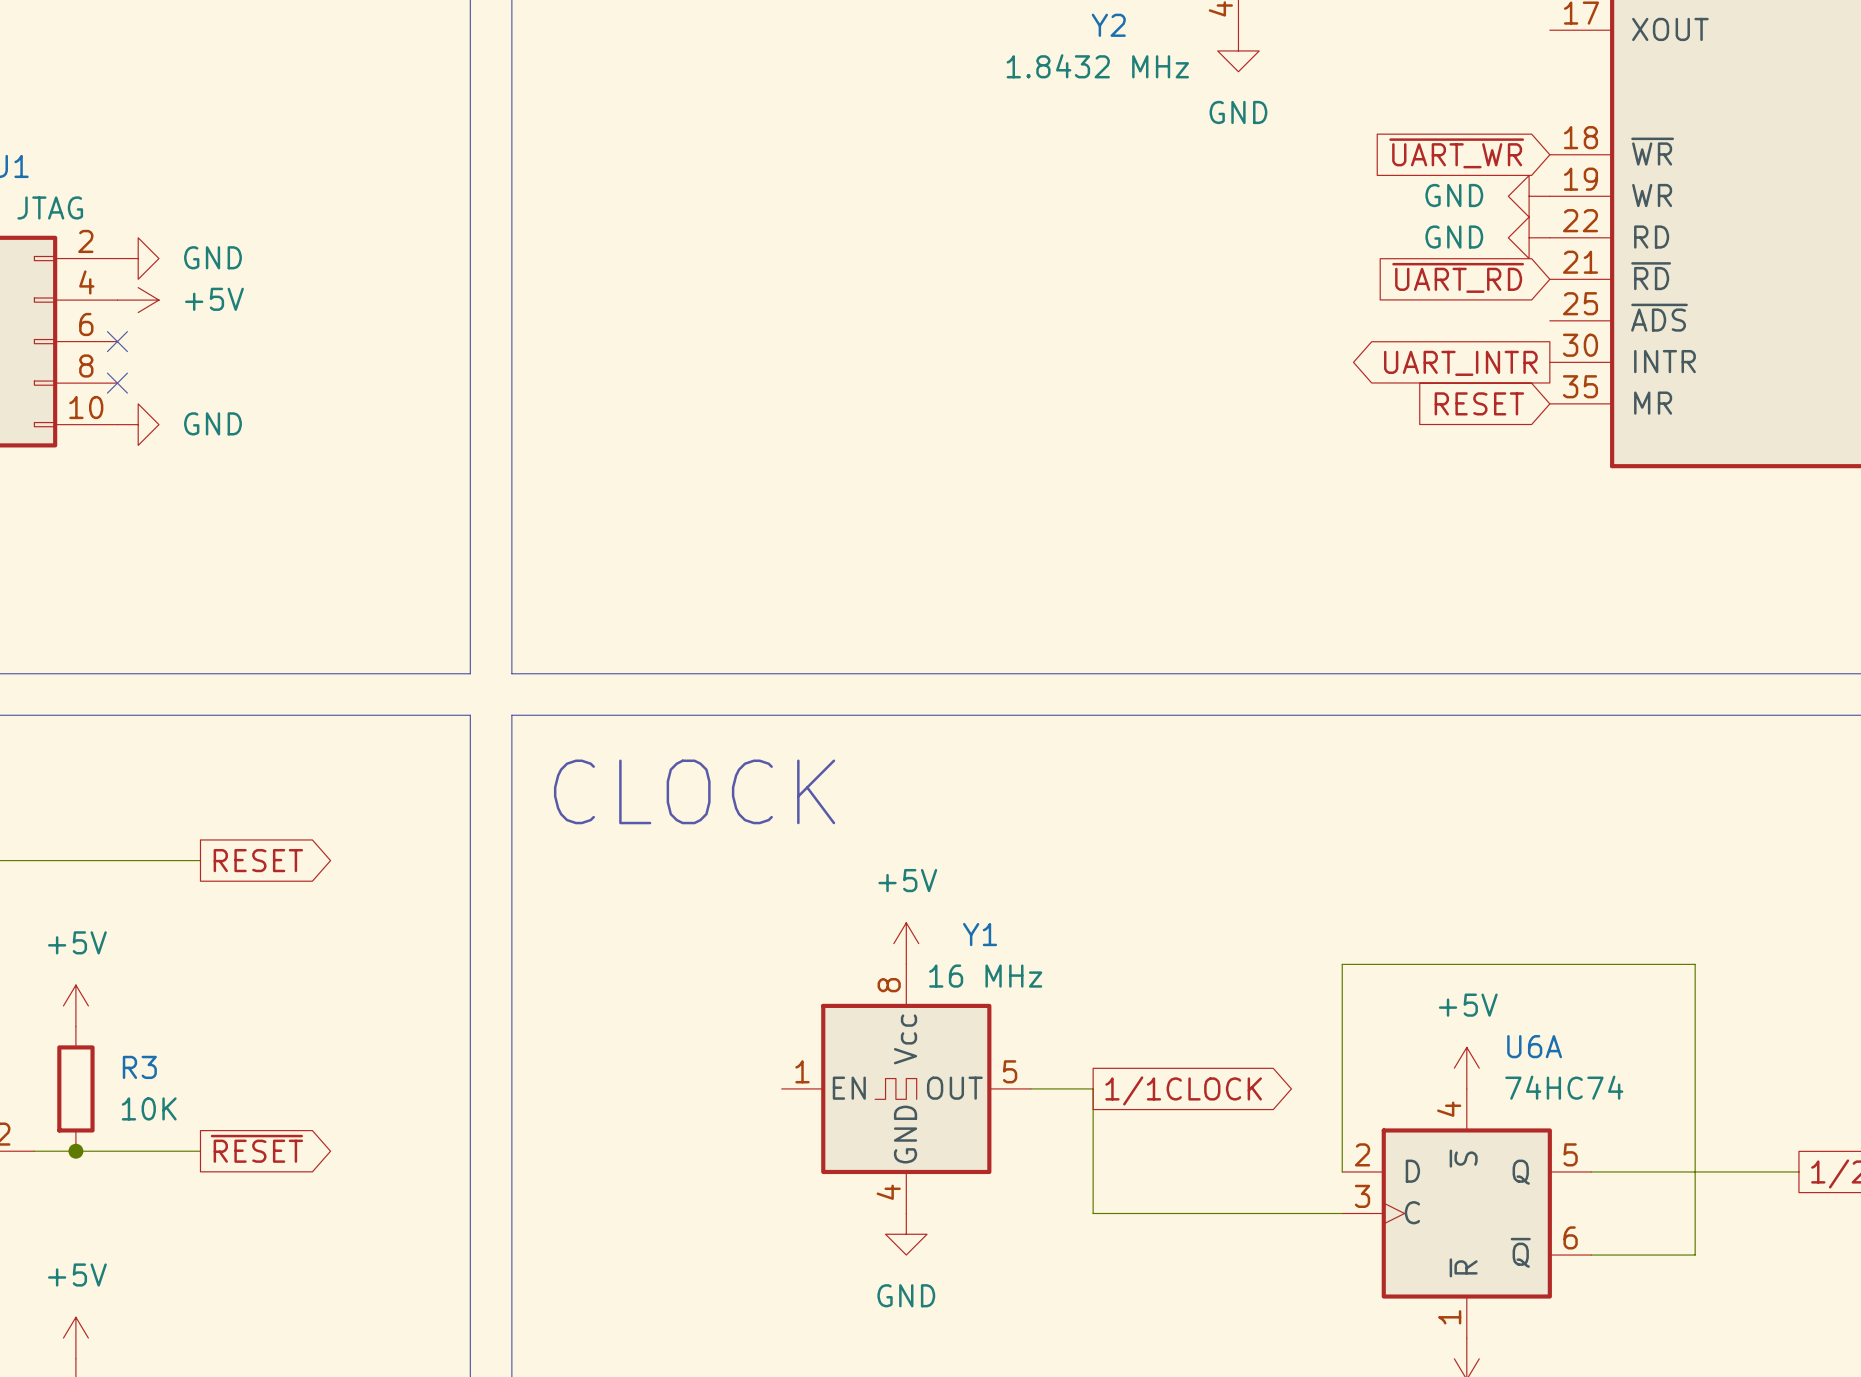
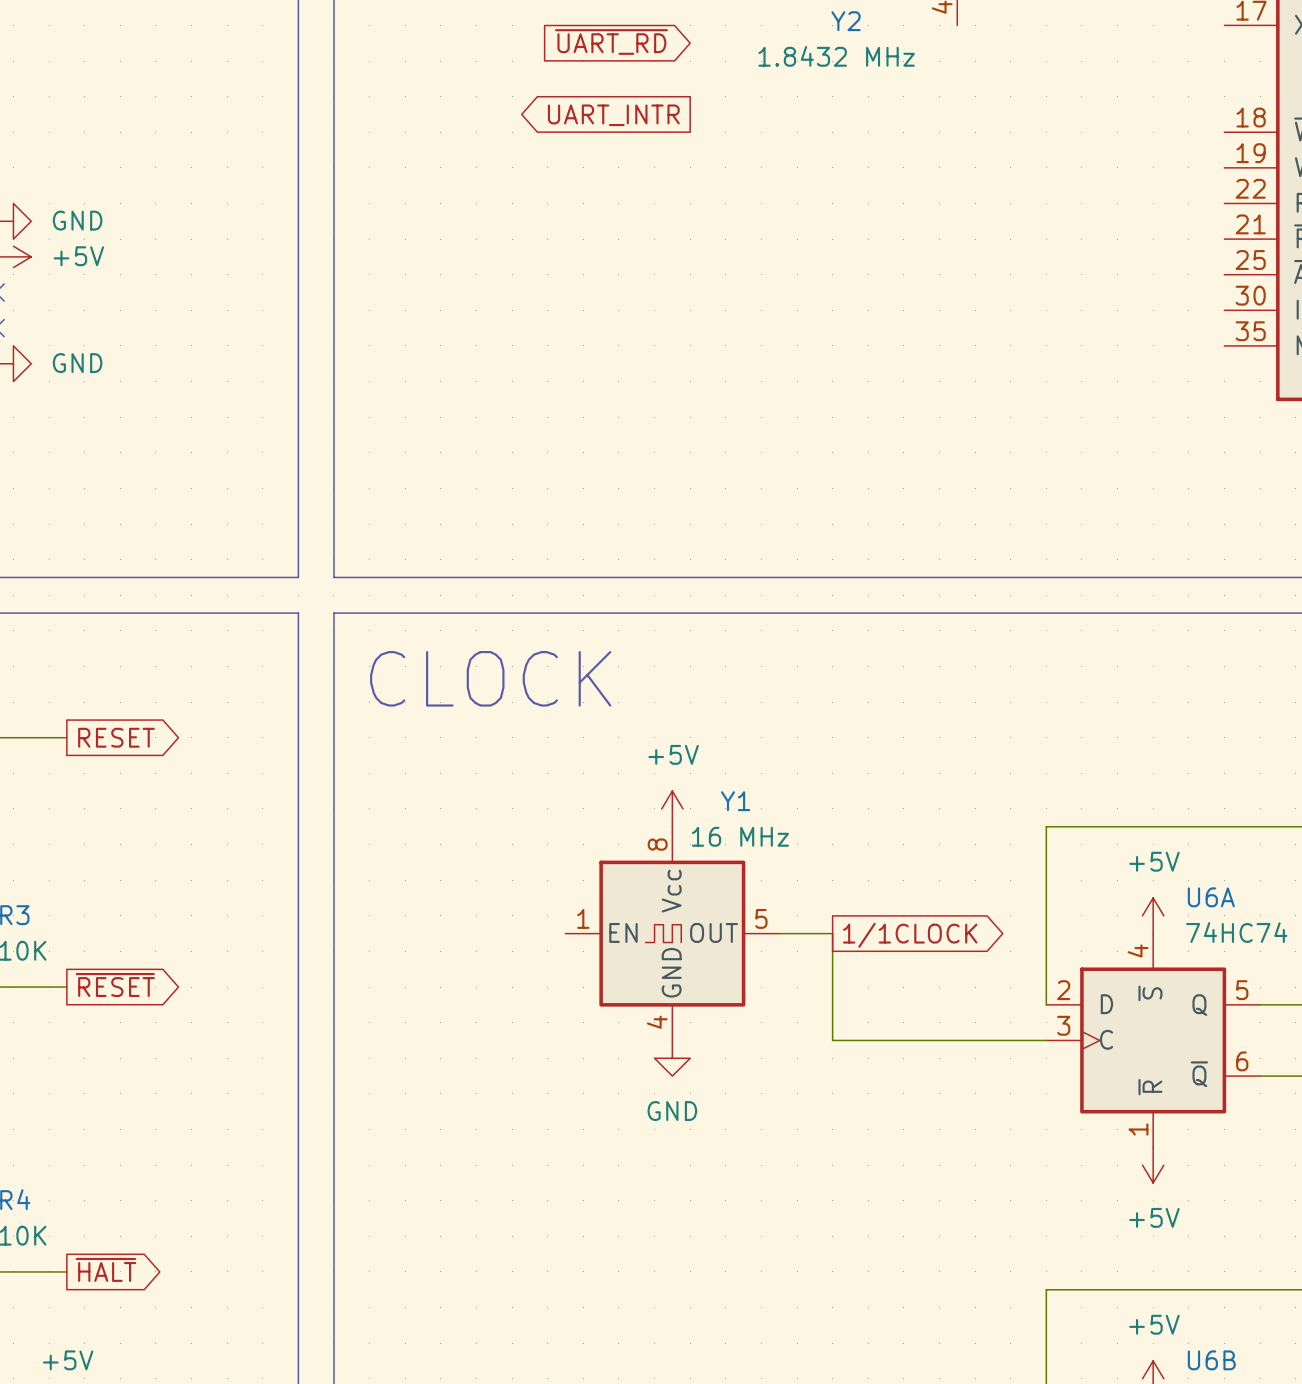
global label: none -> ~{UART_RD} (611, 42)
power symbol: GND (1238, 50) -> none
global label: none -> UART_INTR (613, 115)
global label: ~{UART_WR} (1456, 153) -> none
power symbol: GND (1529, 196) -> none
power symbol: GND (1529, 237) -> none
global label: ~{UART_RD} (1458, 277) -> none
global label: UART_INTR (1460, 363) -> none
global label: RESET (1479, 403) -> none

